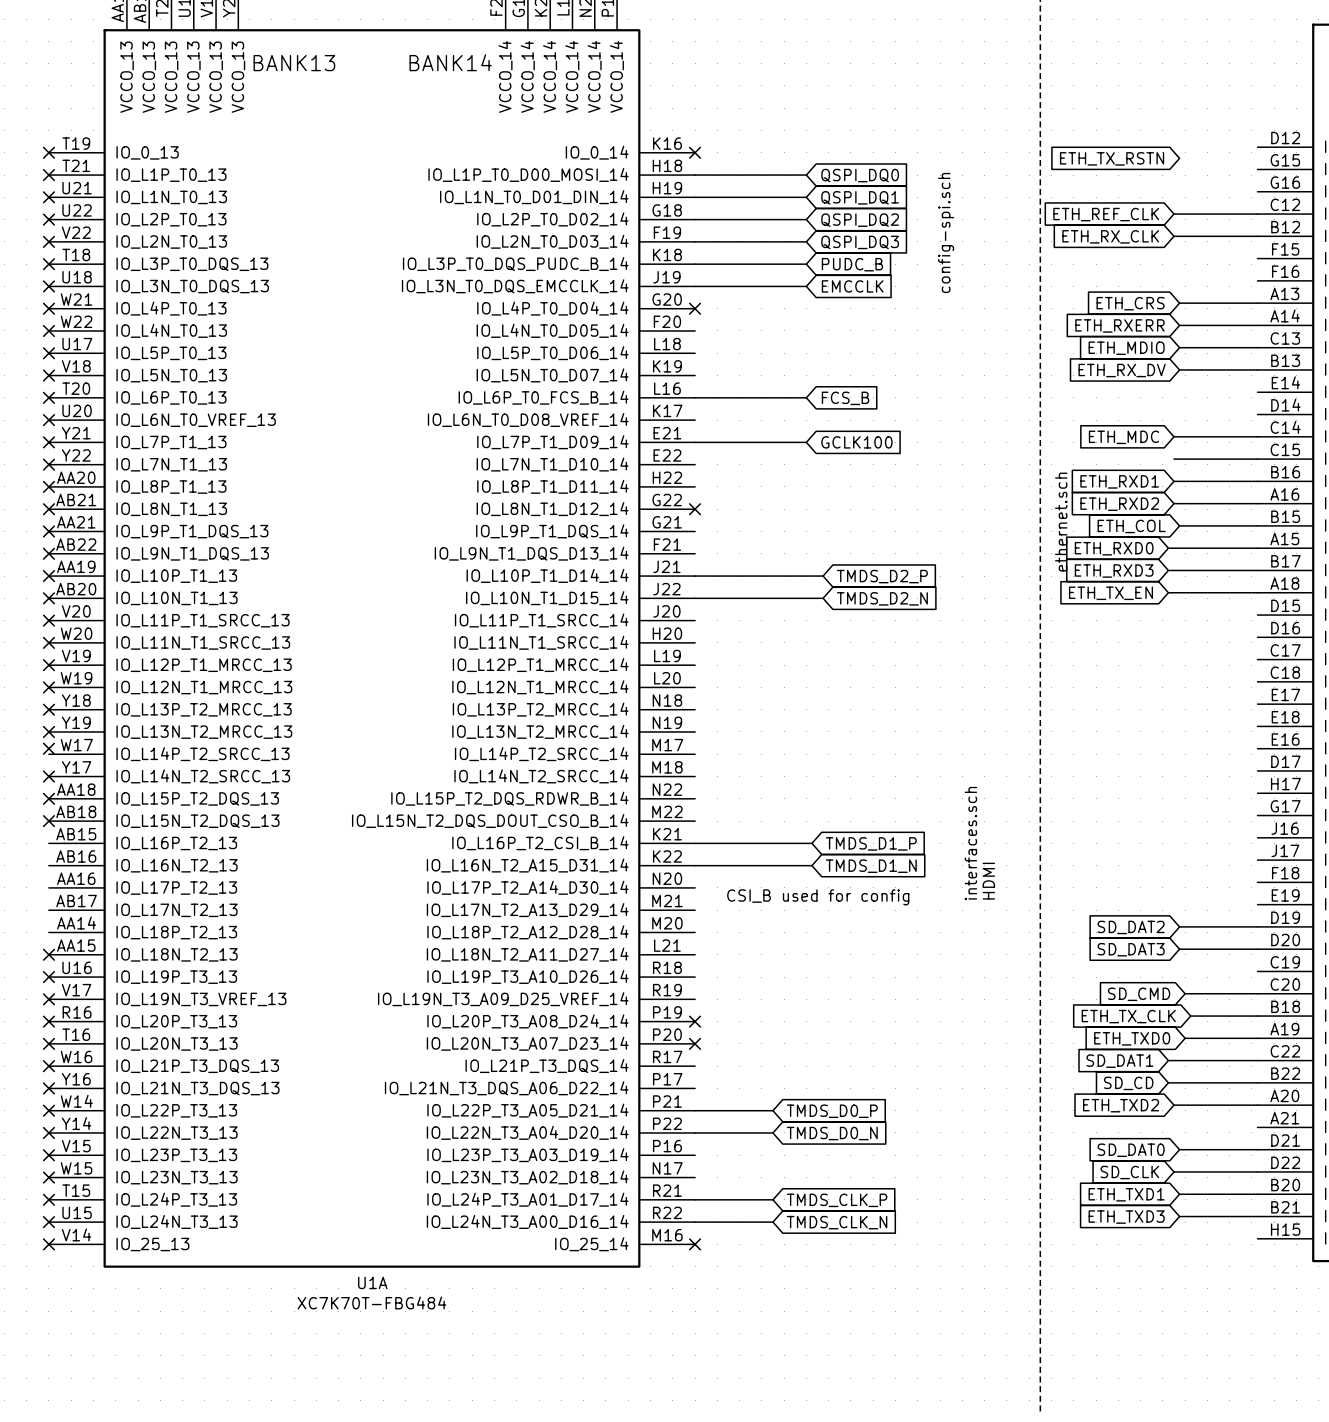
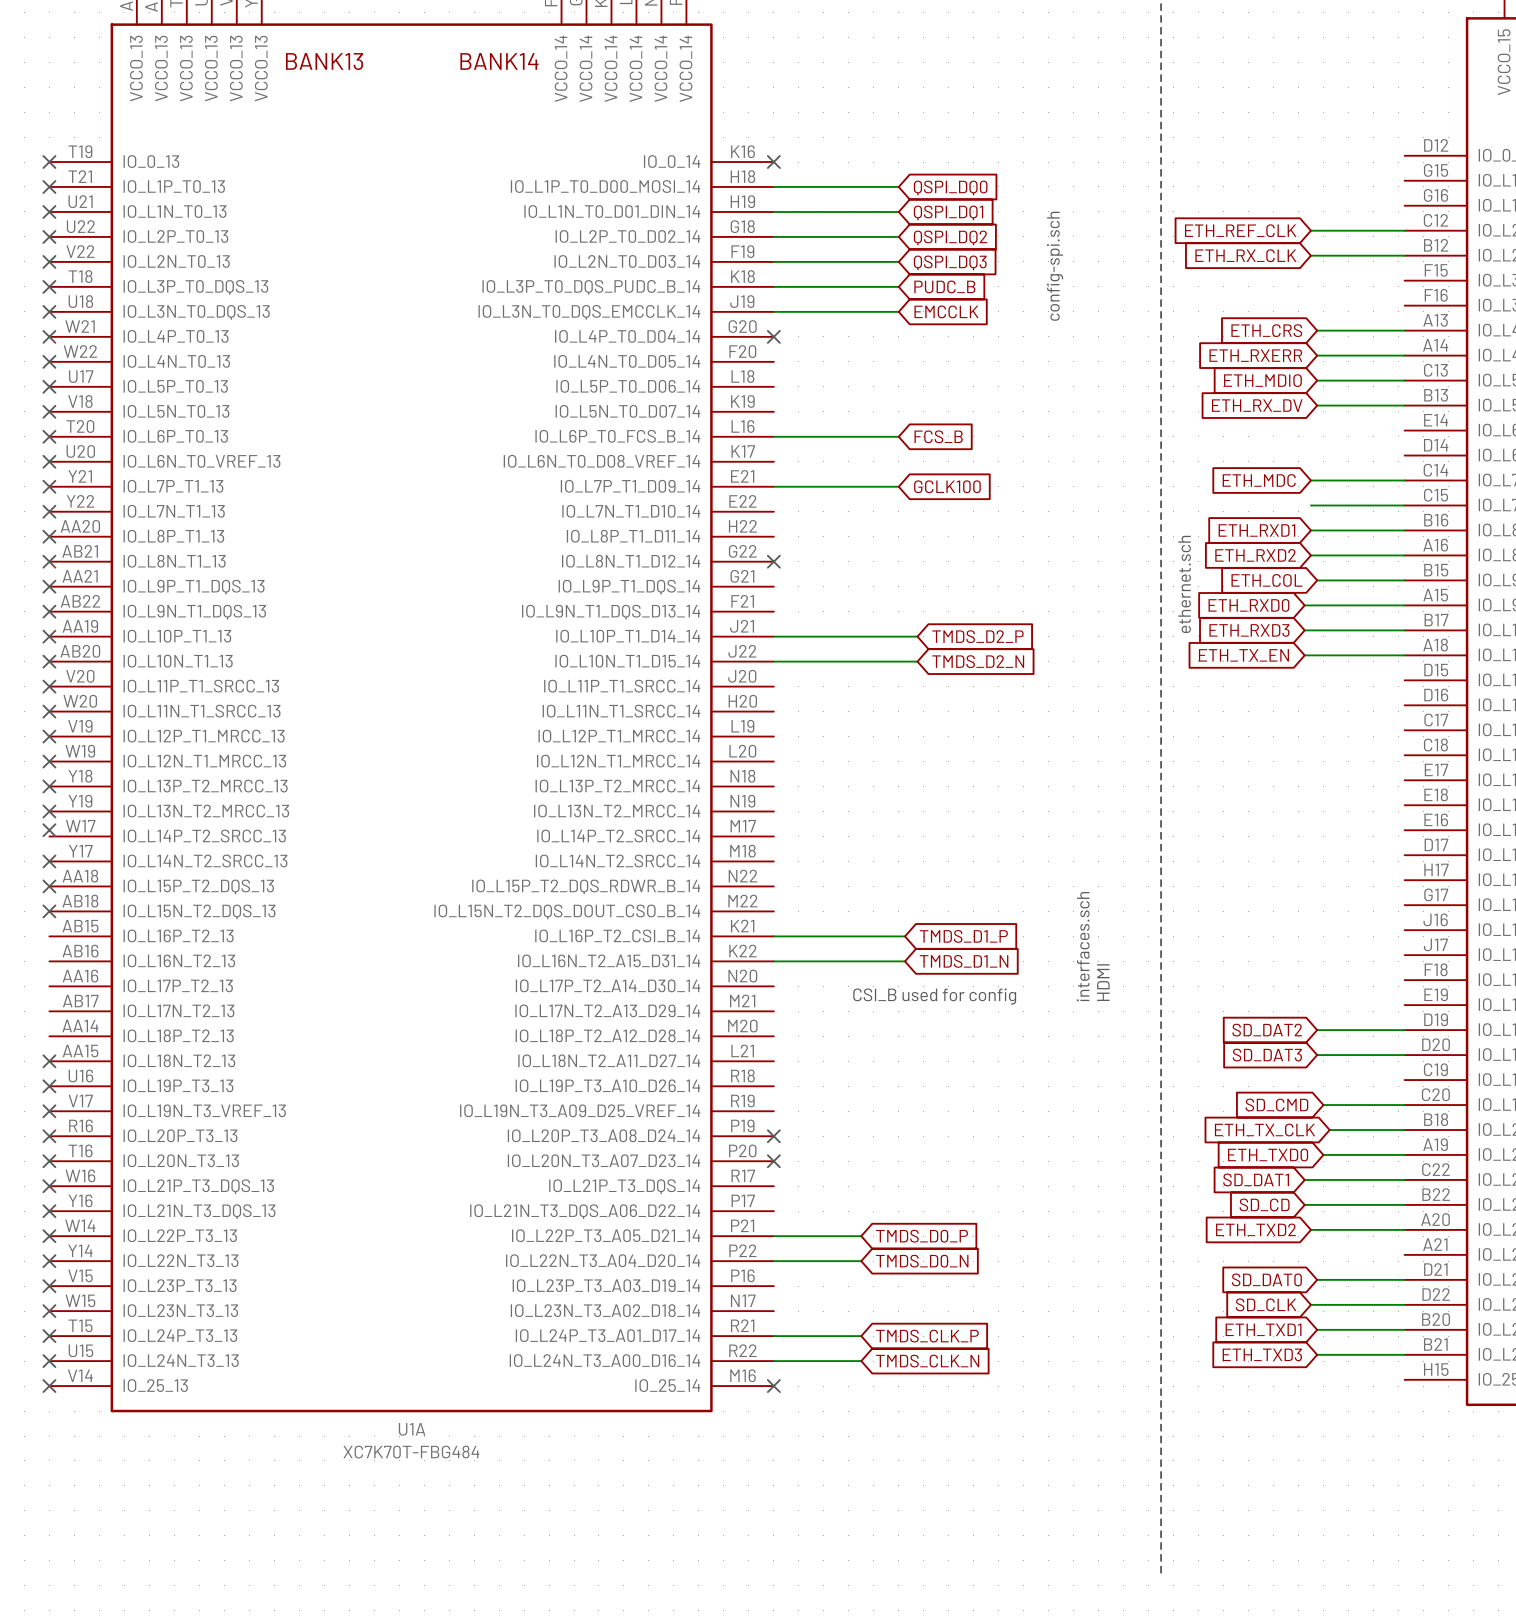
global label: ETH_TX_RSTN (1112, 158) -> none

